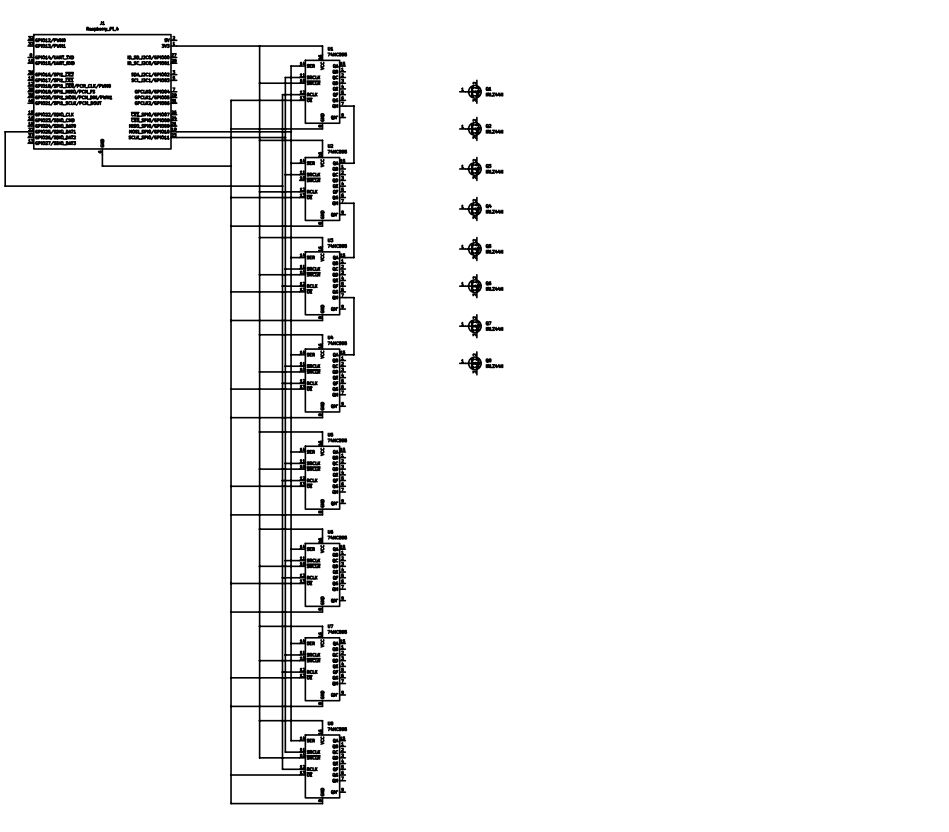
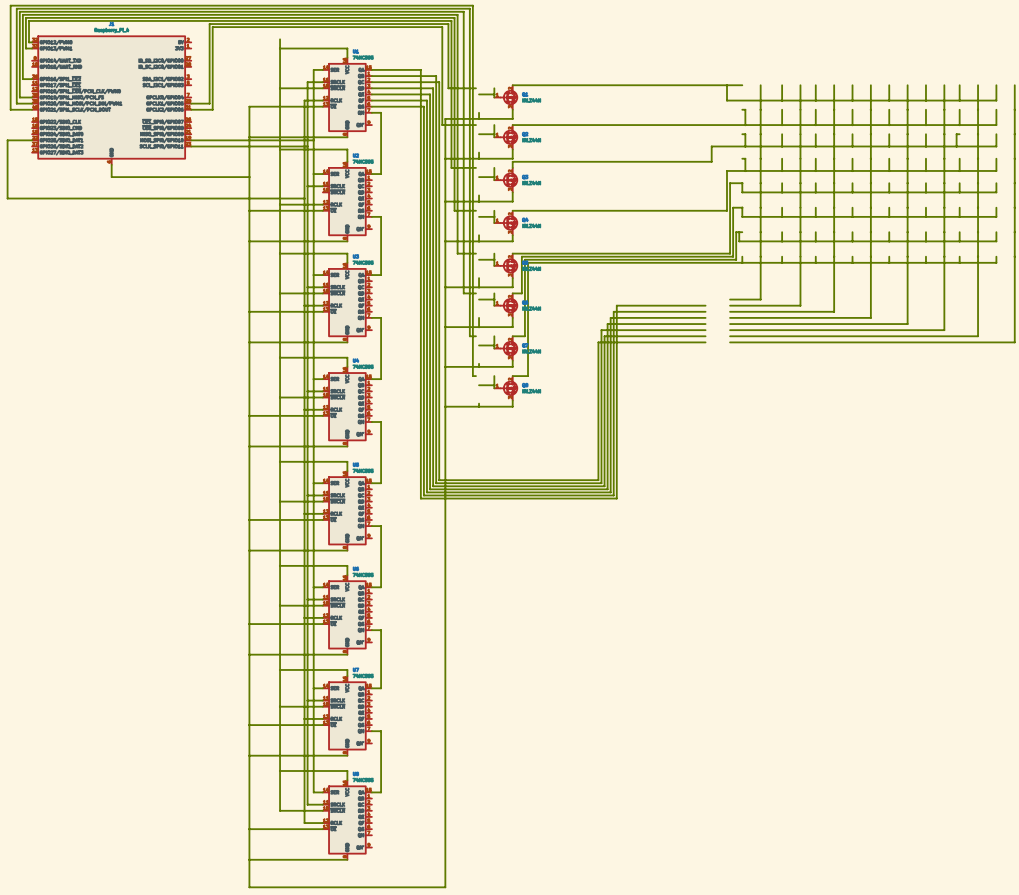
wire: none -> (32, 42) (29, 42) (29, 20) (451, 20) (451, 167) (475, 167)
wire: none -> (32, 48) (25, 48) (25, 17) (454, 17) (454, 210) (475, 210)
wire: (176, 46) (259, 46) -> (280, 39) (280, 48)
wire: none -> (371, 69) (420, 69) (420, 498) (616, 498) (616, 305) (705, 305)
wire: none -> (371, 76) (436, 76) (436, 483) (601, 483) (601, 330) (705, 330)
wire: none -> (32, 79) (22, 79) (22, 14) (457, 14) (457, 253) (475, 253)
wire: none -> (371, 82) (439, 82) (439, 480) (598, 480) (598, 342) (705, 342)
wire: none -> (512, 85) (742, 85)
wire: none -> (727, 85) (727, 100) (996, 100) (996, 85)
wire: none -> (760, 85) (760, 299) (730, 299)
wire: none -> (782, 85) (782, 100)
wire: none -> (800, 85) (800, 305) (730, 305)
wire: none -> (815, 85) (815, 100)
wire: none -> (834, 85) (834, 311) (730, 311)
wire: none -> (852, 85) (852, 100)
wire: none -> (870, 85) (870, 317) (730, 317)
wire: none -> (889, 85) (889, 100)
wire: none -> (907, 85) (907, 324) (730, 324)
wire: none -> (925, 85) (925, 100)
wire: none -> (944, 85) (944, 330) (730, 330)
wire: none -> (959, 85) (959, 100)
wire: none -> (978, 85) (978, 336) (730, 336)
wire: none -> (1014, 85) (1014, 342) (730, 342)
wire: none -> (371, 88) (433, 88) (433, 486) (604, 486) (604, 336) (705, 336)
wire: none -> (475, 88) (448, 88) (448, 24) (209, 24) (209, 103) (191, 103)
wire: none -> (494, 88) (494, 97)
wire: none -> (371, 94) (430, 94) (430, 489) (607, 489) (607, 324) (705, 324)
wire: none -> (479, 94) (494, 94)
wire: none -> (32, 97) (19, 97) (19, 11) (463, 11) (463, 293) (475, 293)
wire: none -> (371, 100) (426, 100) (426, 492) (610, 492) (610, 317) (705, 317)
wire: none -> (32, 103) (16, 103) (16, 8) (469, 8) (469, 336) (475, 336)
wire: none -> (371, 106) (423, 106) (423, 495) (613, 495) (613, 311) (705, 311)
wire: none -> (32, 109) (10, 109) (10, 5) (472, 5) (472, 376) (475, 376)
wire: none -> (191, 109) (212, 109) (212, 27) (442, 27) (442, 125) (475, 125)
wire: none -> (512, 109) (512, 118) (445, 118) (445, 887) (249, 887) (249, 859)
wire: none -> (742, 109) (745, 109) (745, 125)
wire: none -> (782, 109) (782, 125)
wire: none -> (815, 109) (815, 125)
wire: none -> (852, 109) (852, 125)
wire: none -> (889, 109) (889, 125)
wire: none -> (925, 109) (925, 125)
wire: none -> (959, 109) (959, 125)
wire: none -> (996, 109) (996, 125) (512, 125)
wire: none -> (479, 112) (479, 118)
wire: none -> (494, 125) (494, 137)
wire: none -> (479, 134) (494, 134)
wire: none -> (742, 134) (745, 134) (745, 146)
wire: none -> (782, 134) (782, 146)
wire: none -> (815, 134) (815, 146)
wire: none -> (852, 134) (852, 146)
wire: none -> (889, 134) (889, 146)
wire: none -> (925, 134) (925, 146)
wire: none -> (959, 134) (956, 134) (956, 146)
wire: none -> (996, 134) (996, 146) (711, 146) (711, 161) (512, 161) (512, 167)
wire: none -> (512, 149) (512, 158) (445, 158)
wire: none -> (479, 152) (479, 158)
wire: none -> (742, 158) (745, 158) (745, 170)
wire: none -> (782, 158) (782, 170)
wire: none -> (815, 158) (815, 170)
wire: none -> (852, 158) (852, 170)
wire: none -> (889, 158) (889, 170)
wire: none -> (925, 158) (925, 170)
wire: none -> (959, 158) (959, 170)
wire: none -> (996, 158) (996, 170) (727, 170) (727, 210) (512, 210)
wire: none -> (494, 167) (494, 180)
wire: none -> (479, 177) (494, 177)
wire: none -> (782, 183) (782, 192)
wire: none -> (815, 183) (815, 192)
wire: none -> (852, 183) (852, 192)
wire: none -> (889, 183) (889, 192)
wire: none -> (925, 183) (925, 192)
wire: none -> (959, 183) (959, 192)
wire: none -> (996, 183) (996, 192) (742, 192) (742, 183) (730, 183) (730, 253) (512, 253)
wire: none -> (512, 192) (512, 201) (445, 201)
wire: none -> (479, 195) (479, 201)
wire: none -> (782, 207) (782, 216)
wire: none -> (815, 207) (815, 216)
wire: none -> (852, 207) (852, 216)
wire: none -> (889, 207) (889, 216)
wire: none -> (925, 207) (925, 216)
wire: none -> (959, 207) (959, 216)
wire: none -> (996, 207) (996, 216) (742, 216) (742, 207) (733, 207) (733, 256) (521, 256) (521, 293) (512, 293)
wire: none -> (494, 210) (494, 223)
wire: none -> (479, 216) (494, 216)
wire: none -> (739, 232) (739, 241) (996, 241) (996, 232)
wire: none -> (742, 232) (736, 232) (736, 259) (524, 259) (524, 336) (512, 336)
wire: none -> (782, 232) (782, 241)
wire: none -> (815, 232) (815, 241)
wire: none -> (852, 232) (852, 241)
wire: none -> (889, 232) (889, 241)
wire: none -> (925, 232) (925, 241)
wire: none -> (959, 232) (959, 241)
wire: none -> (479, 235) (479, 241)
wire: none -> (512, 235) (512, 241) (445, 241)
wire: none -> (494, 253) (494, 265)
wire: none -> (742, 256) (742, 262)
wire: none -> (782, 256) (782, 262)
wire: none -> (815, 256) (815, 262)
wire: none -> (852, 256) (852, 262)
wire: none -> (889, 256) (889, 262)
wire: none -> (925, 256) (925, 262)
wire: none -> (959, 256) (959, 262)
wire: none -> (996, 256) (996, 262) (528, 262) (528, 376) (512, 376)
wire: none -> (479, 259) (494, 259)
wire: none -> (479, 278) (479, 287)
wire: none -> (512, 278) (512, 287) (445, 287)
wire: none -> (494, 293) (494, 305)
wire: none -> (479, 299) (494, 299)
wire: none -> (479, 317) (479, 327)
wire: none -> (512, 317) (512, 327) (445, 327)
wire: none -> (494, 336) (494, 348)
wire: none -> (479, 345) (494, 345)
wire: none -> (512, 360) (512, 366) (445, 366)
wire: none -> (479, 363) (479, 366)
wire: none -> (494, 376) (494, 388)
wire: none -> (479, 385) (494, 385)
wire: none -> (512, 400) (512, 406) (445, 406)
wire: none -> (479, 403) (479, 406)
wire: none -> (371, 422) (381, 422) (381, 483) (371, 483)
wire: none -> (371, 526) (381, 526) (381, 587) (371, 587)
wire: none -> (371, 630) (381, 630) (381, 688) (371, 688)
wire: none -> (371, 731) (381, 731) (381, 792) (371, 792)

